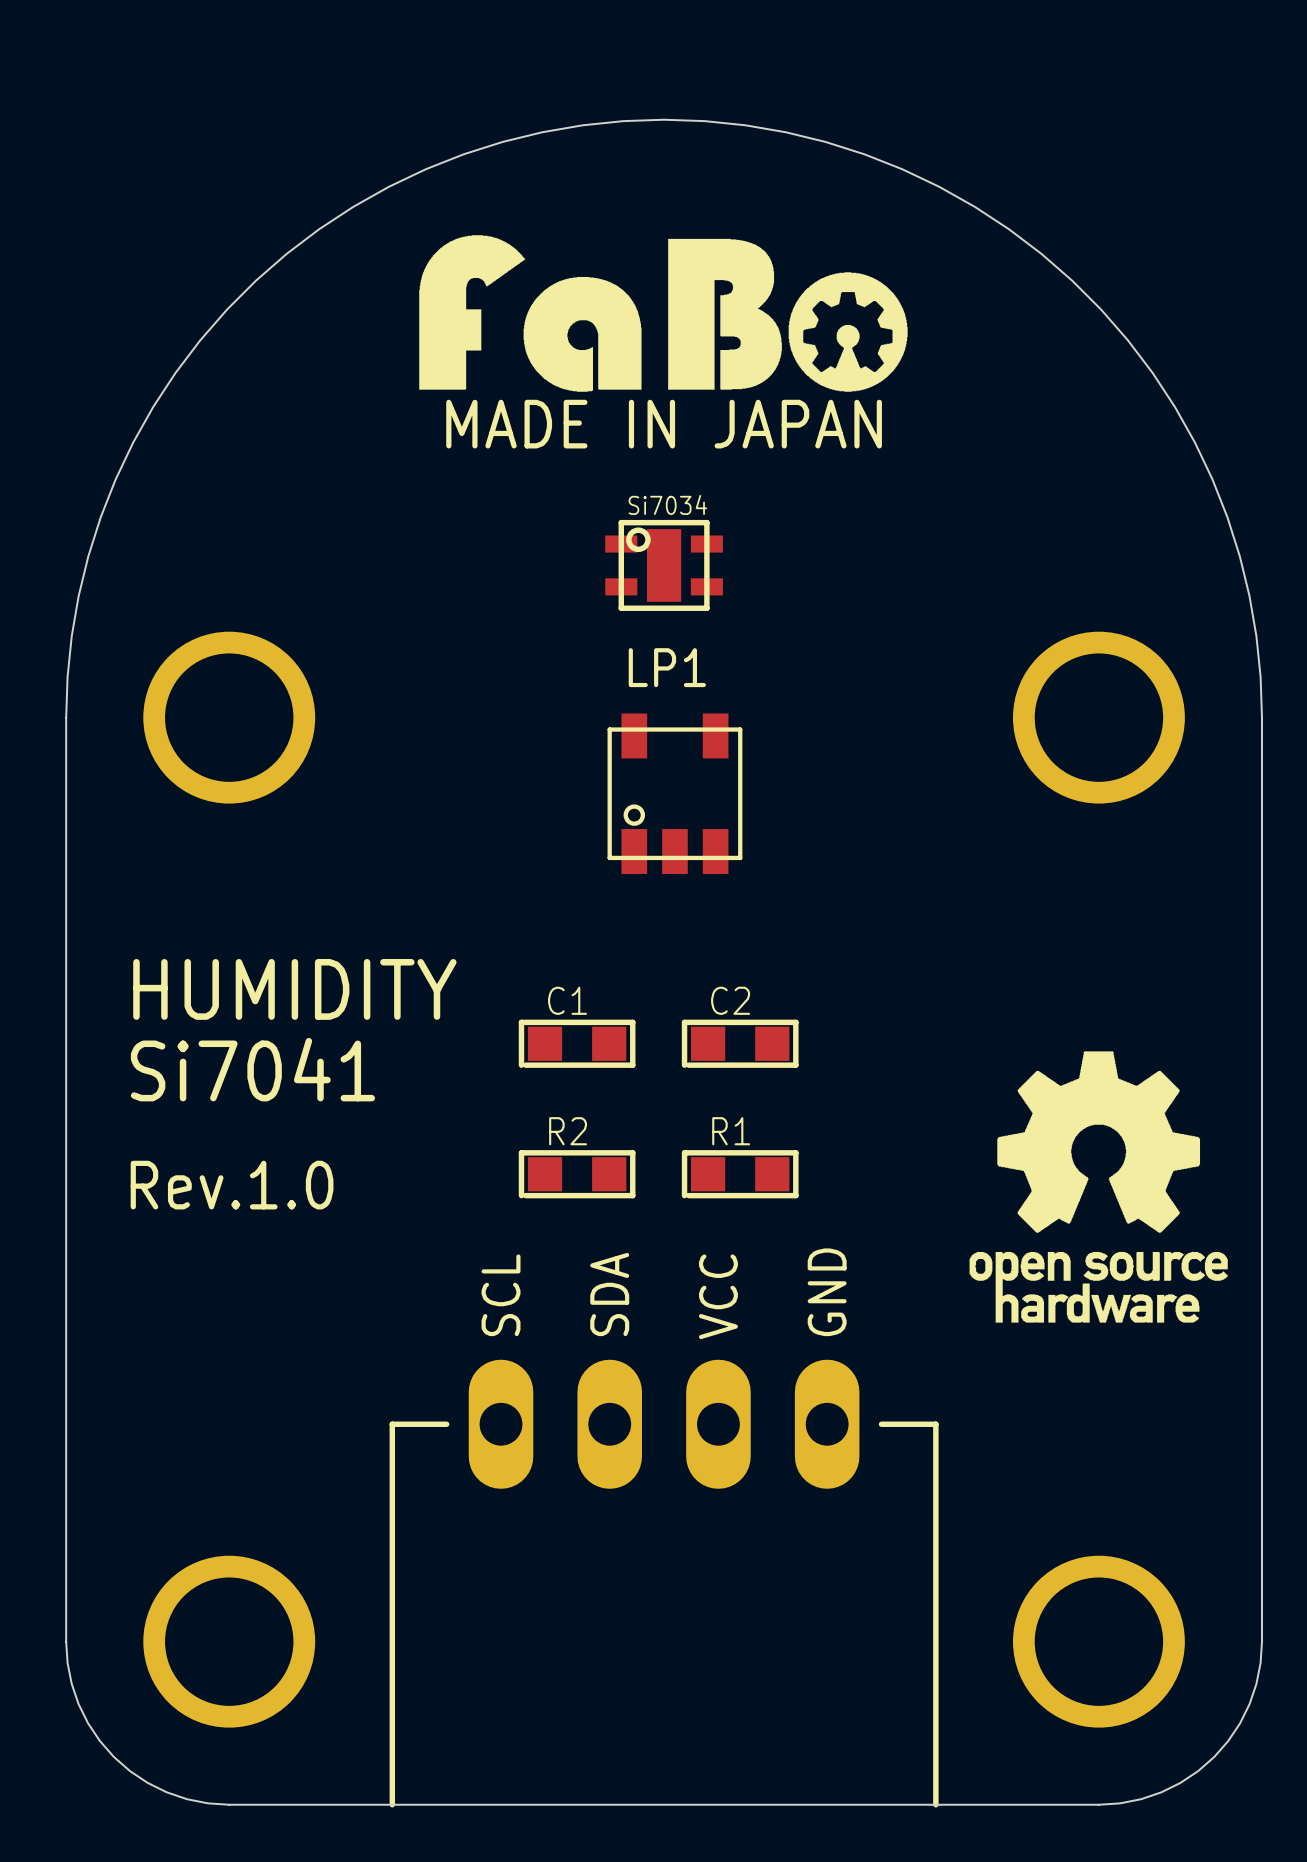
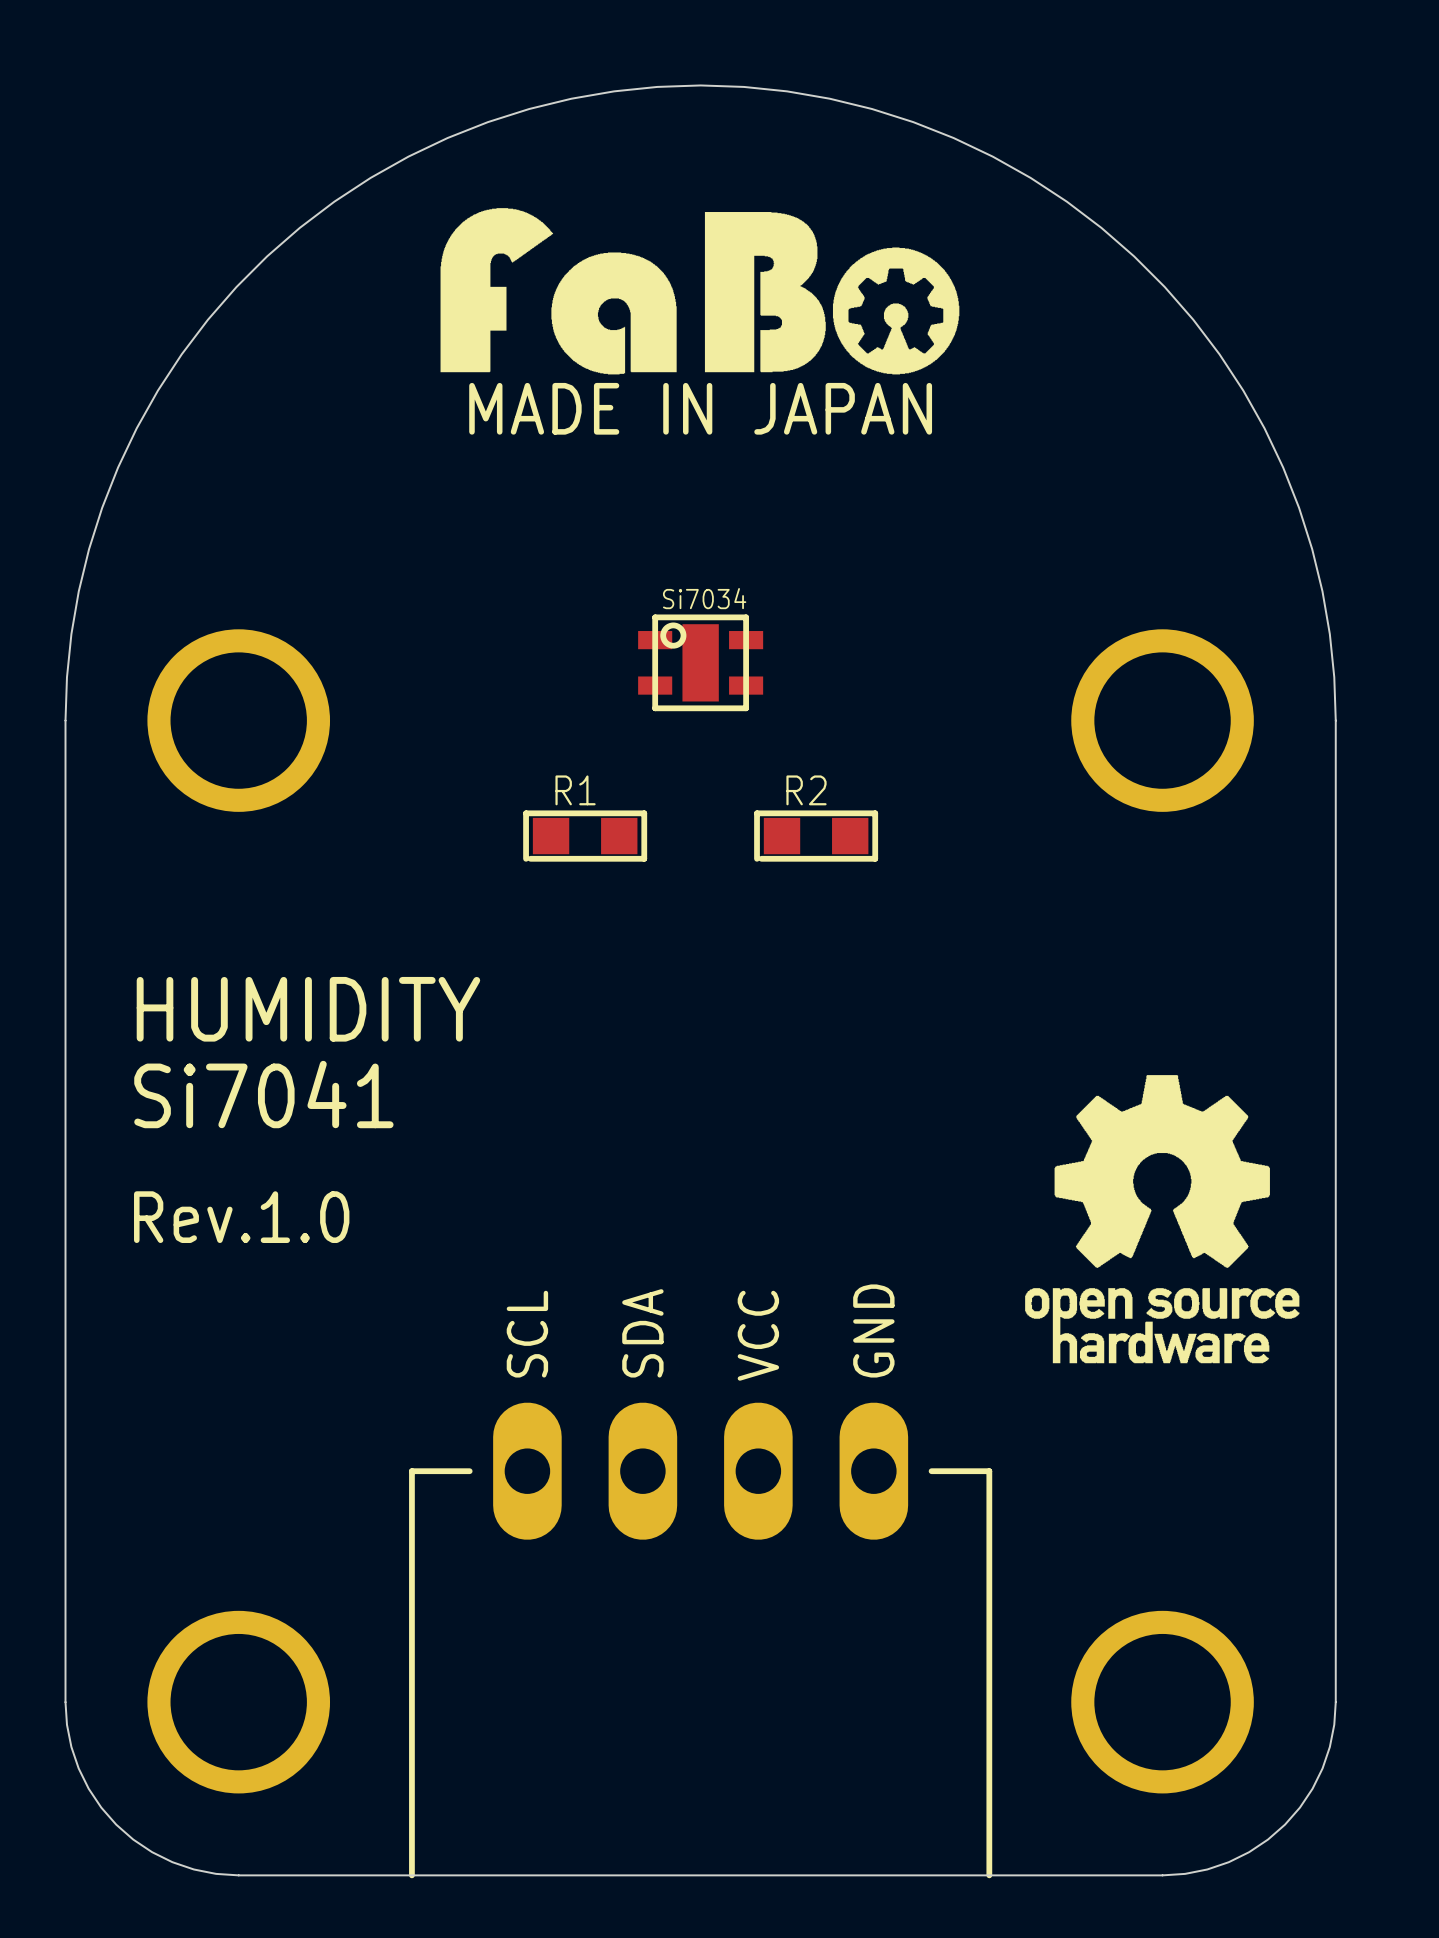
part position: (664, 565) -> (700, 662)
LP1: (674, 793) -> none
C1: (577, 1043) -> none
C2: (740, 1043) -> none
R2 position: (577, 1174) -> (816, 836)
R1 position: (740, 1174) -> (585, 836)

